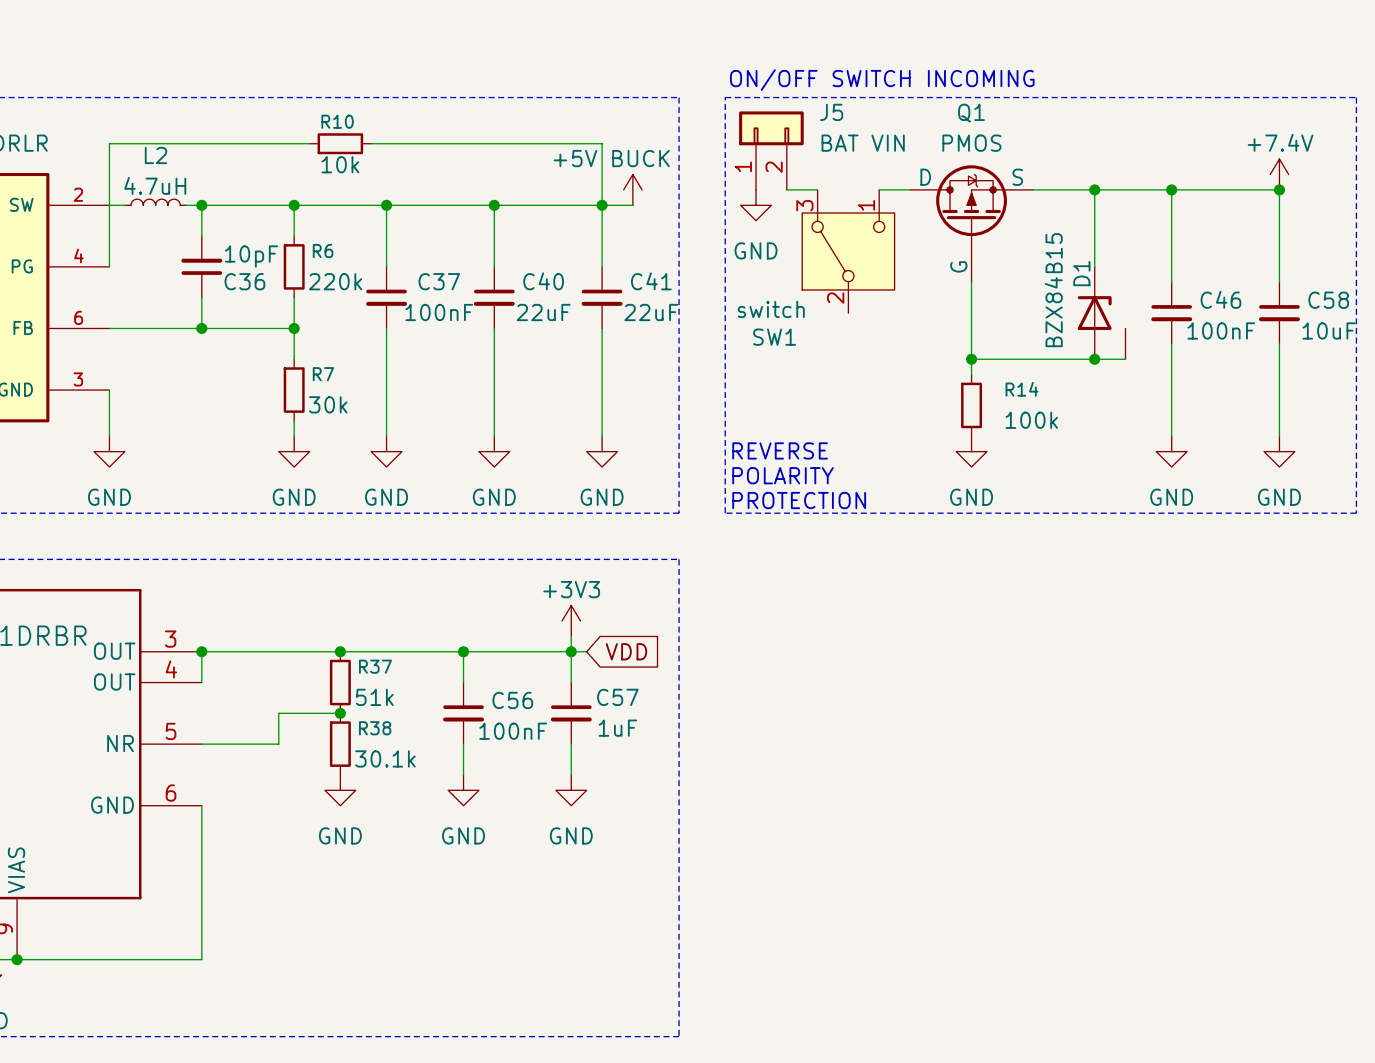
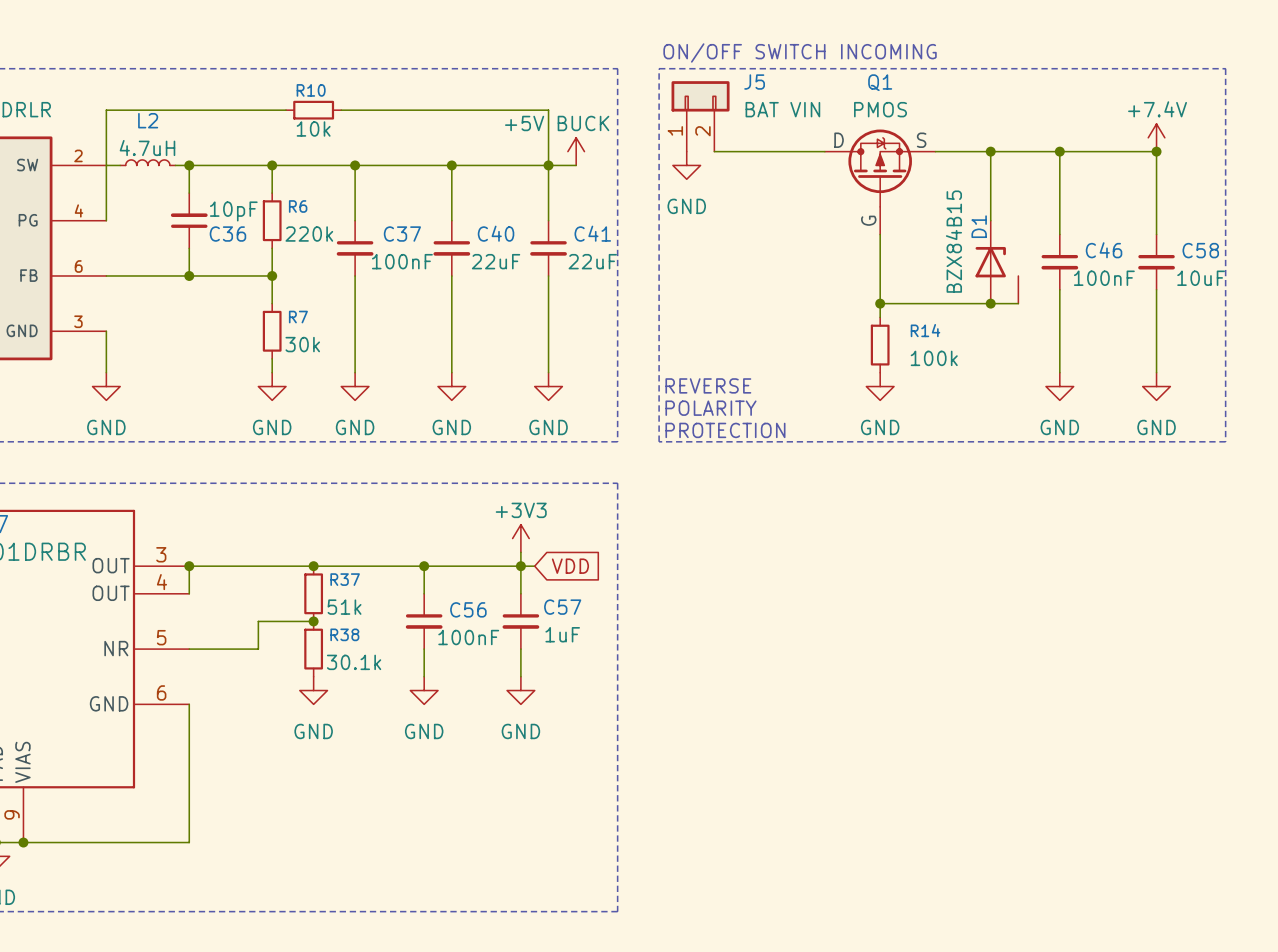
wire: none -> (742, 151) (797, 151)
SW1: switch (848, 251) -> none

